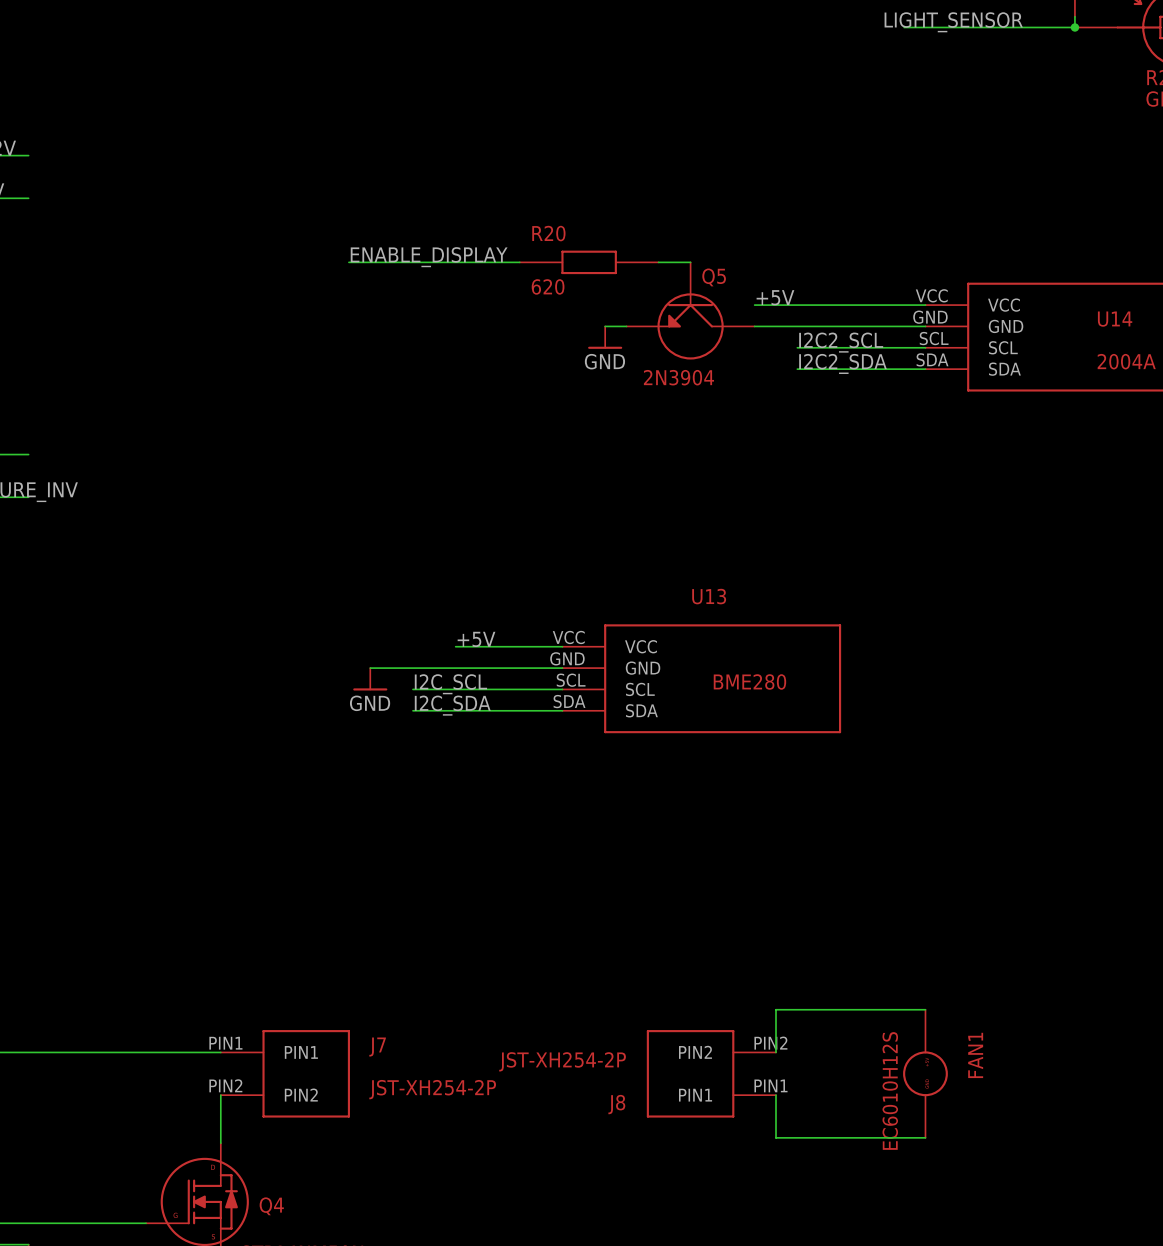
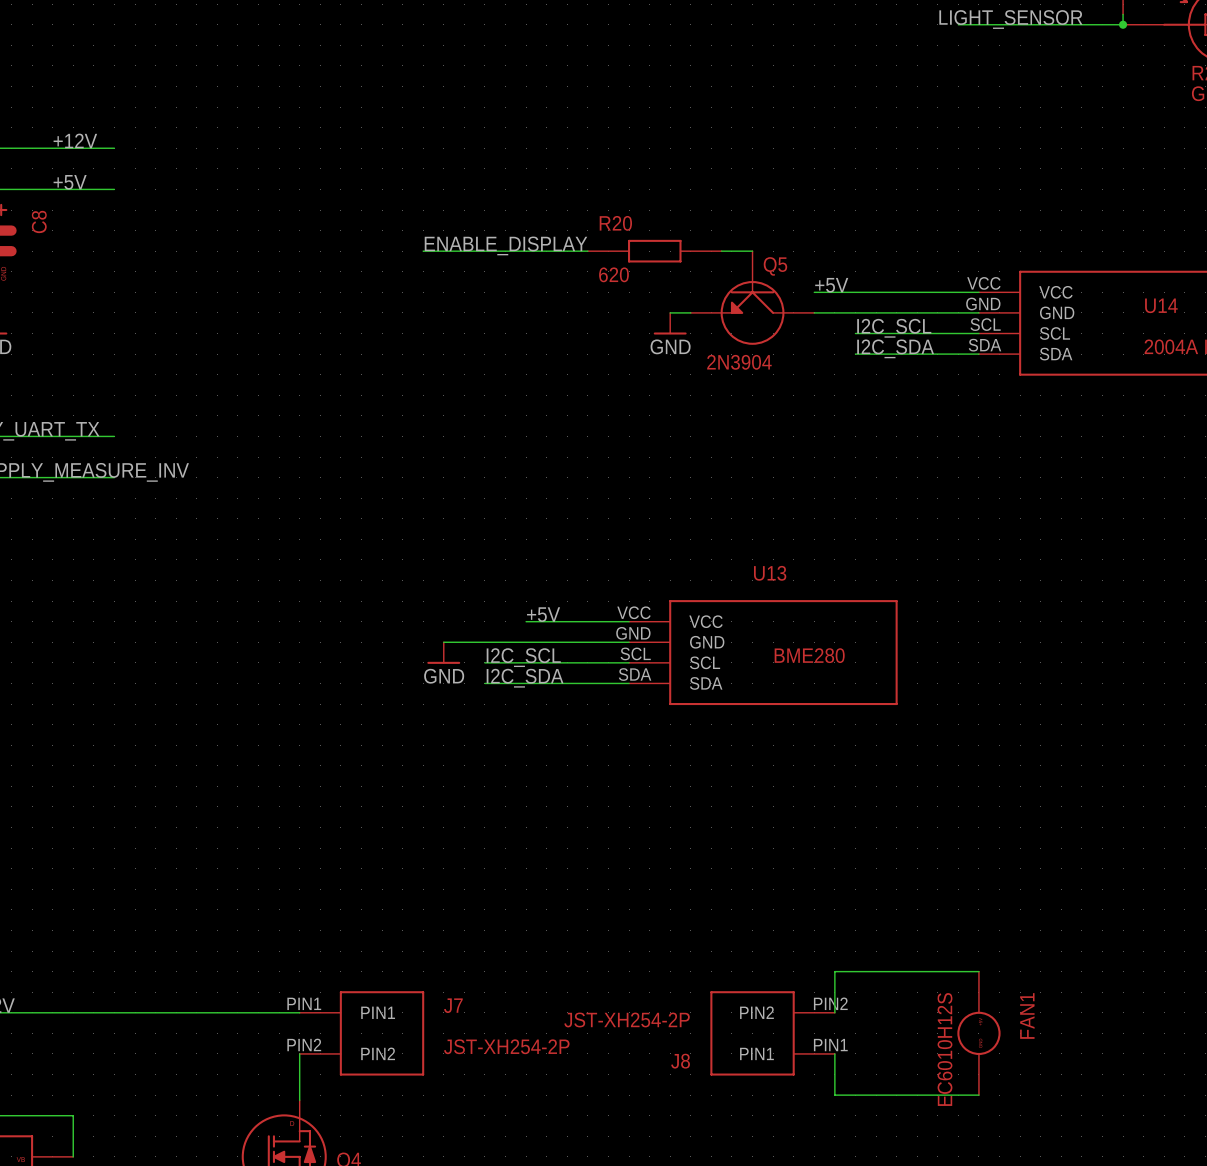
label: I2C2_SCL (841, 342) -> I2C_SCL (894, 328)
label: I2C2_SDA (842, 363) -> I2C_SDA (895, 348)

